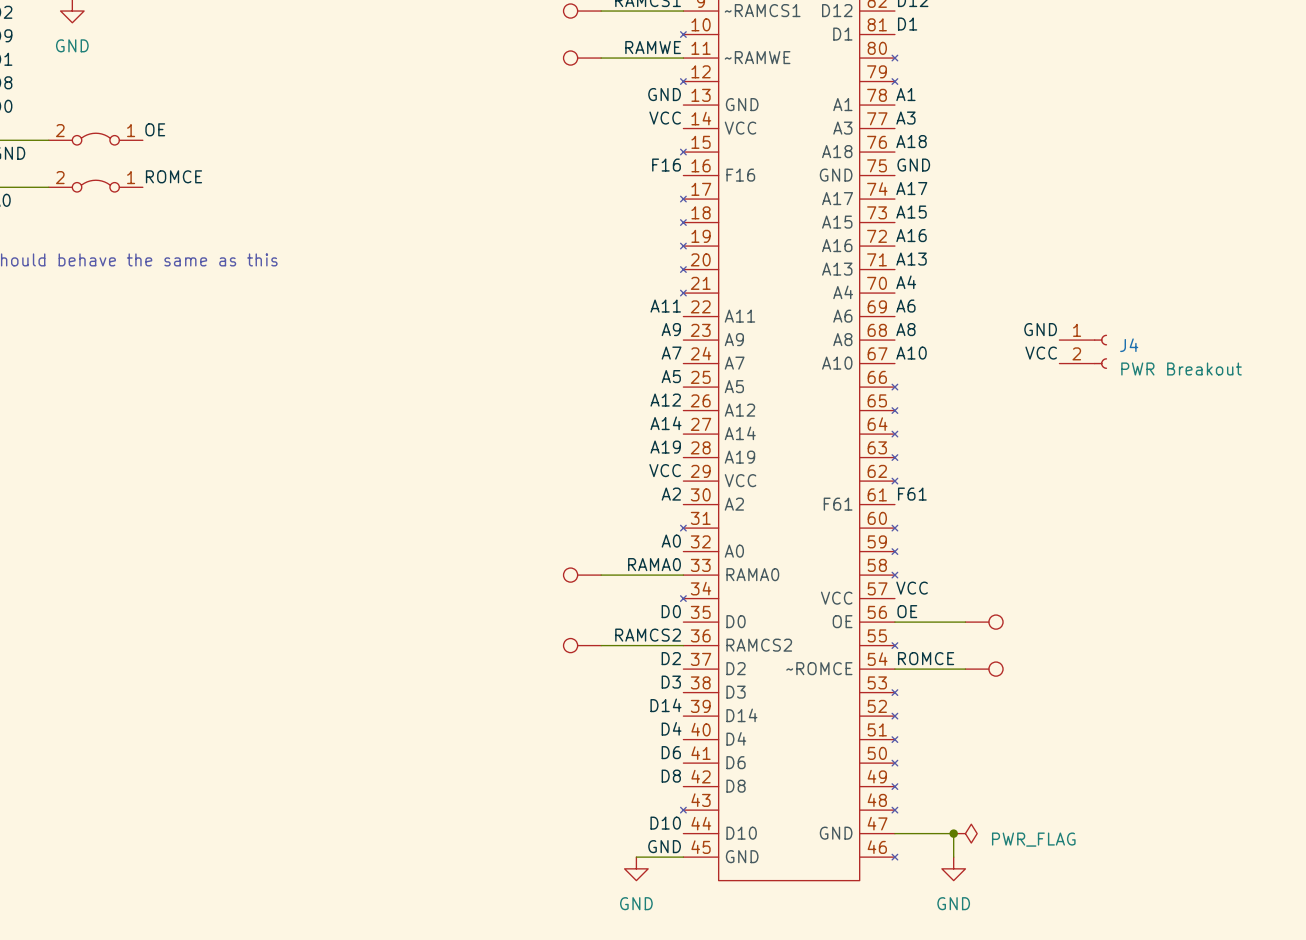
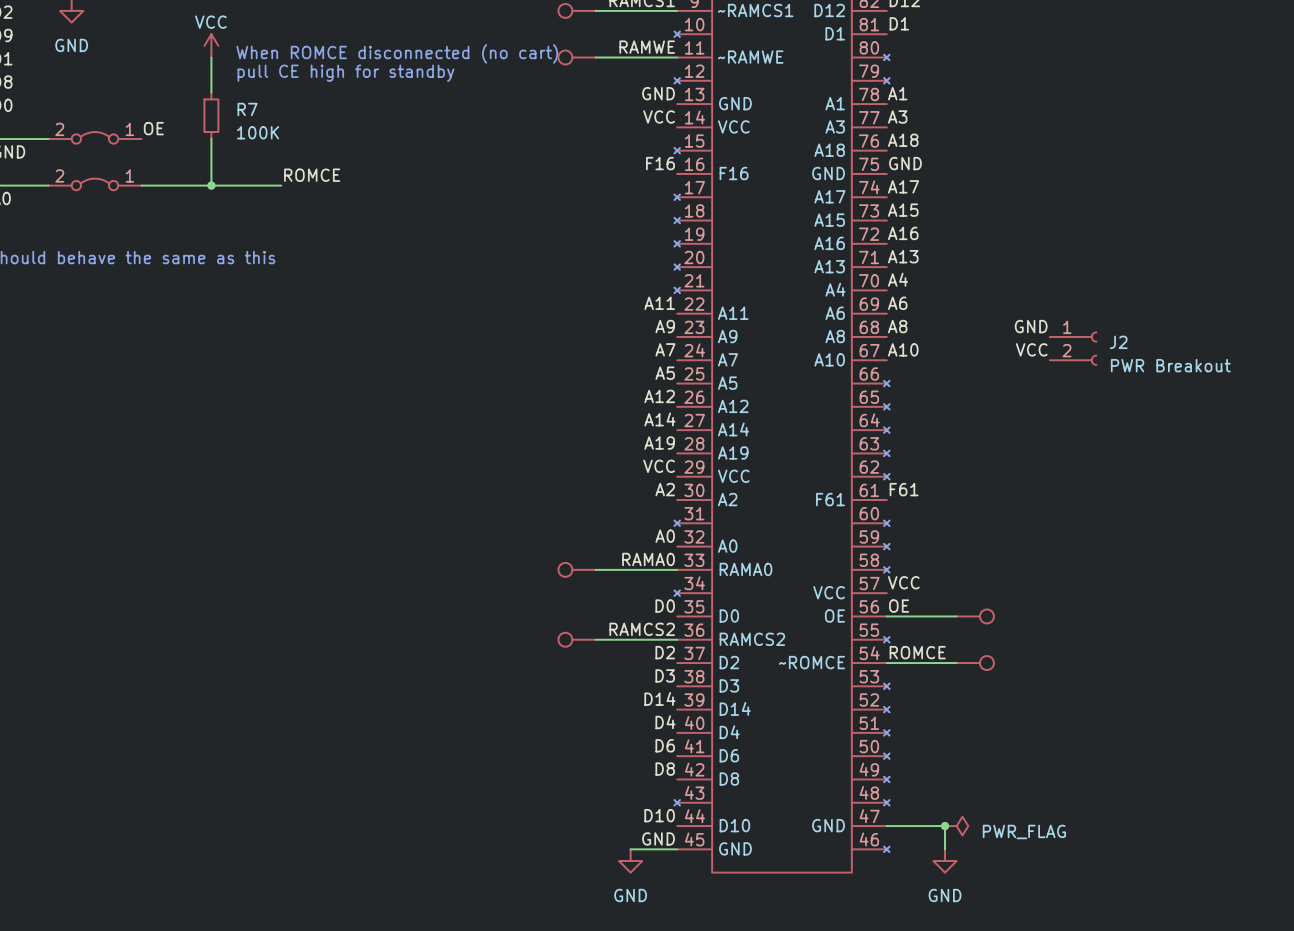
power symbol: none -> VCC (211, 45)
text: none -> When ROMCE disconnected (no cart) (397, 53)
wire: none -> (211, 57) (211, 92)
text: none -> pull CE high for standby (345, 73)
R7: none -> 100K (211, 115)
wire: none -> (211, 139) (211, 185)
label position: ROMCE (173, 176) -> ROMCE (312, 175)
wire: none -> (141, 185) (281, 185)
junction: none -> (211, 185)
J4 name: J4 (1129, 345) -> J2 (1118, 342)

